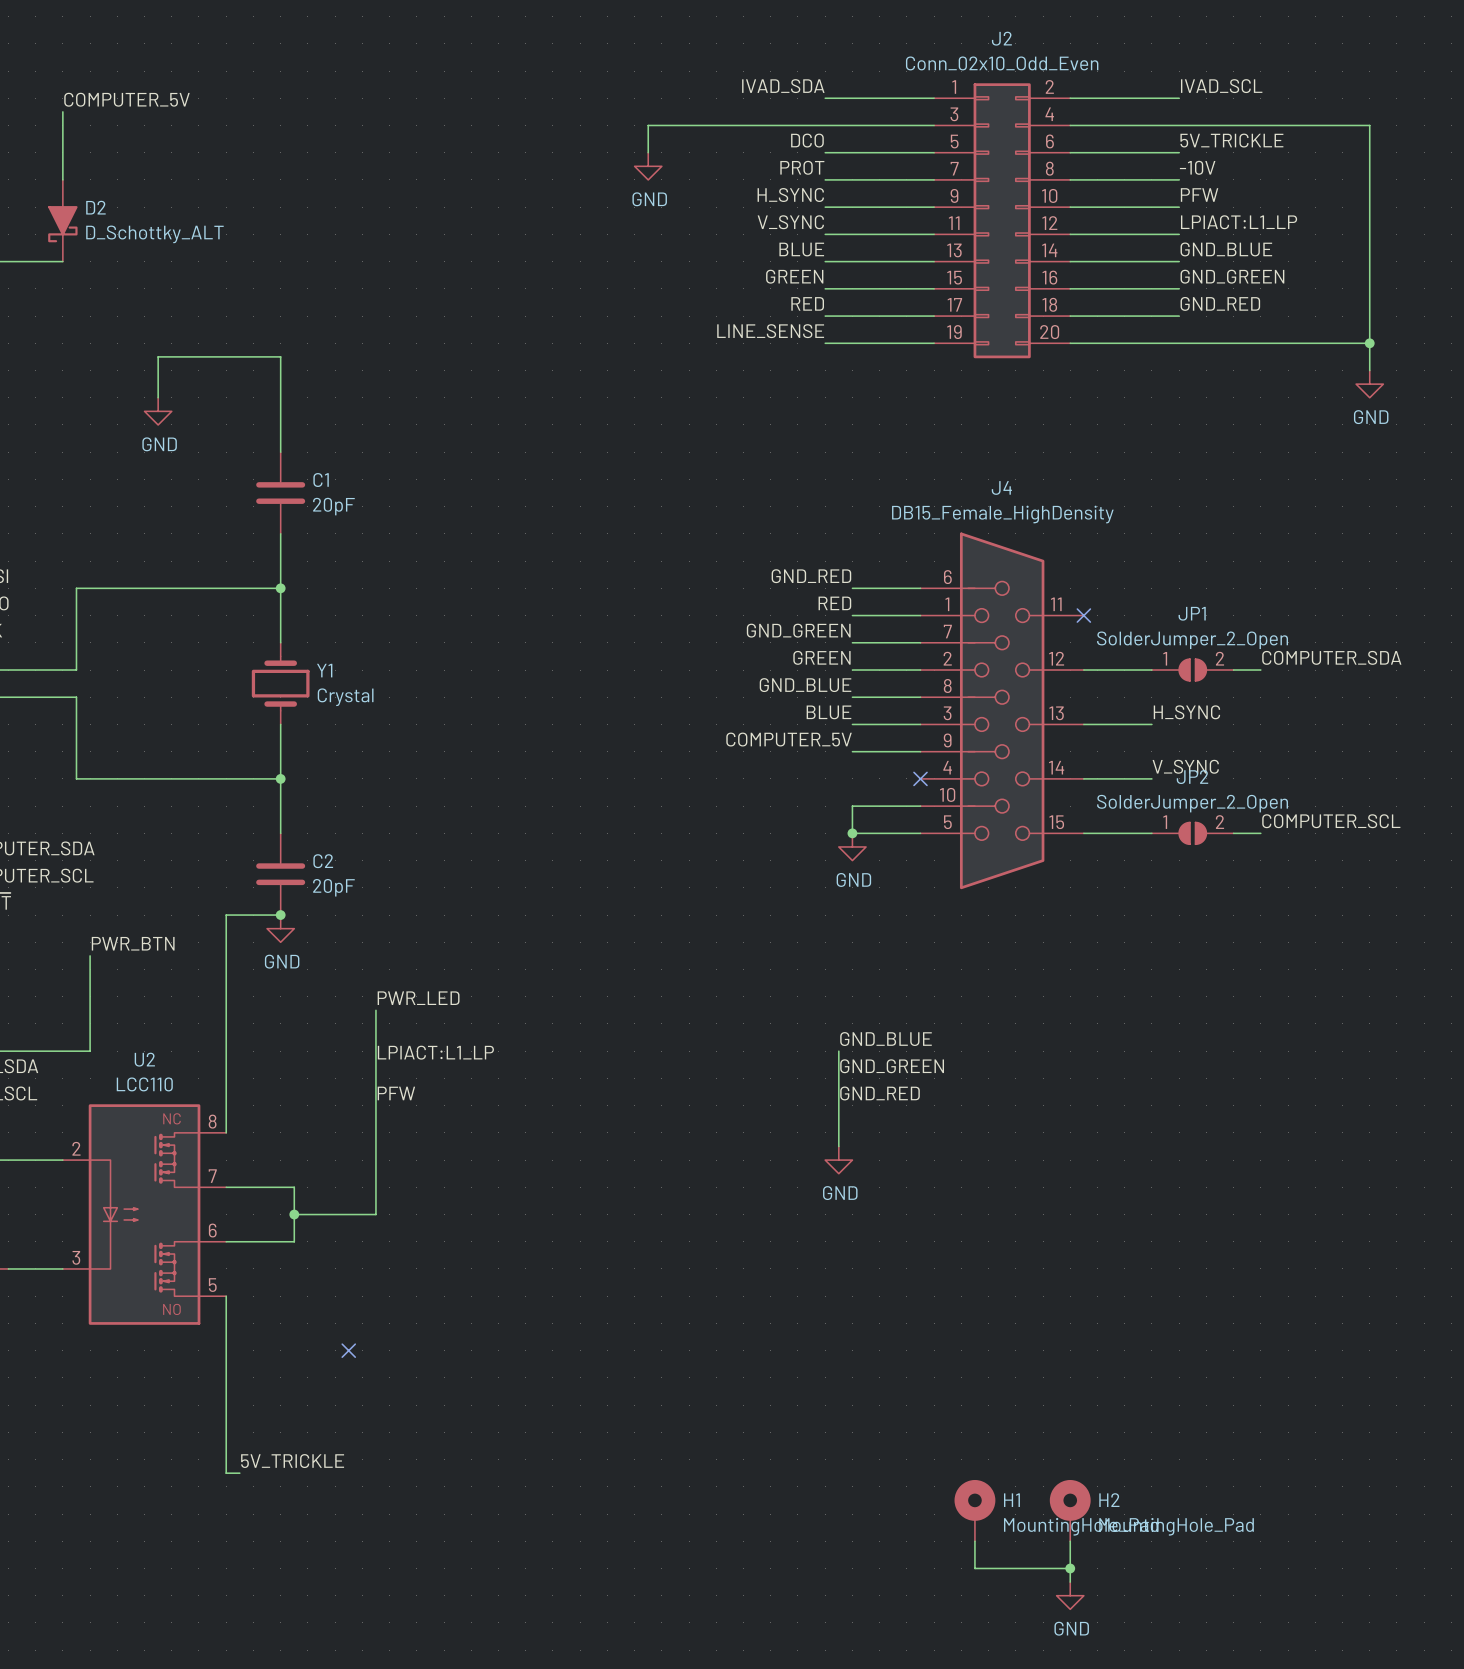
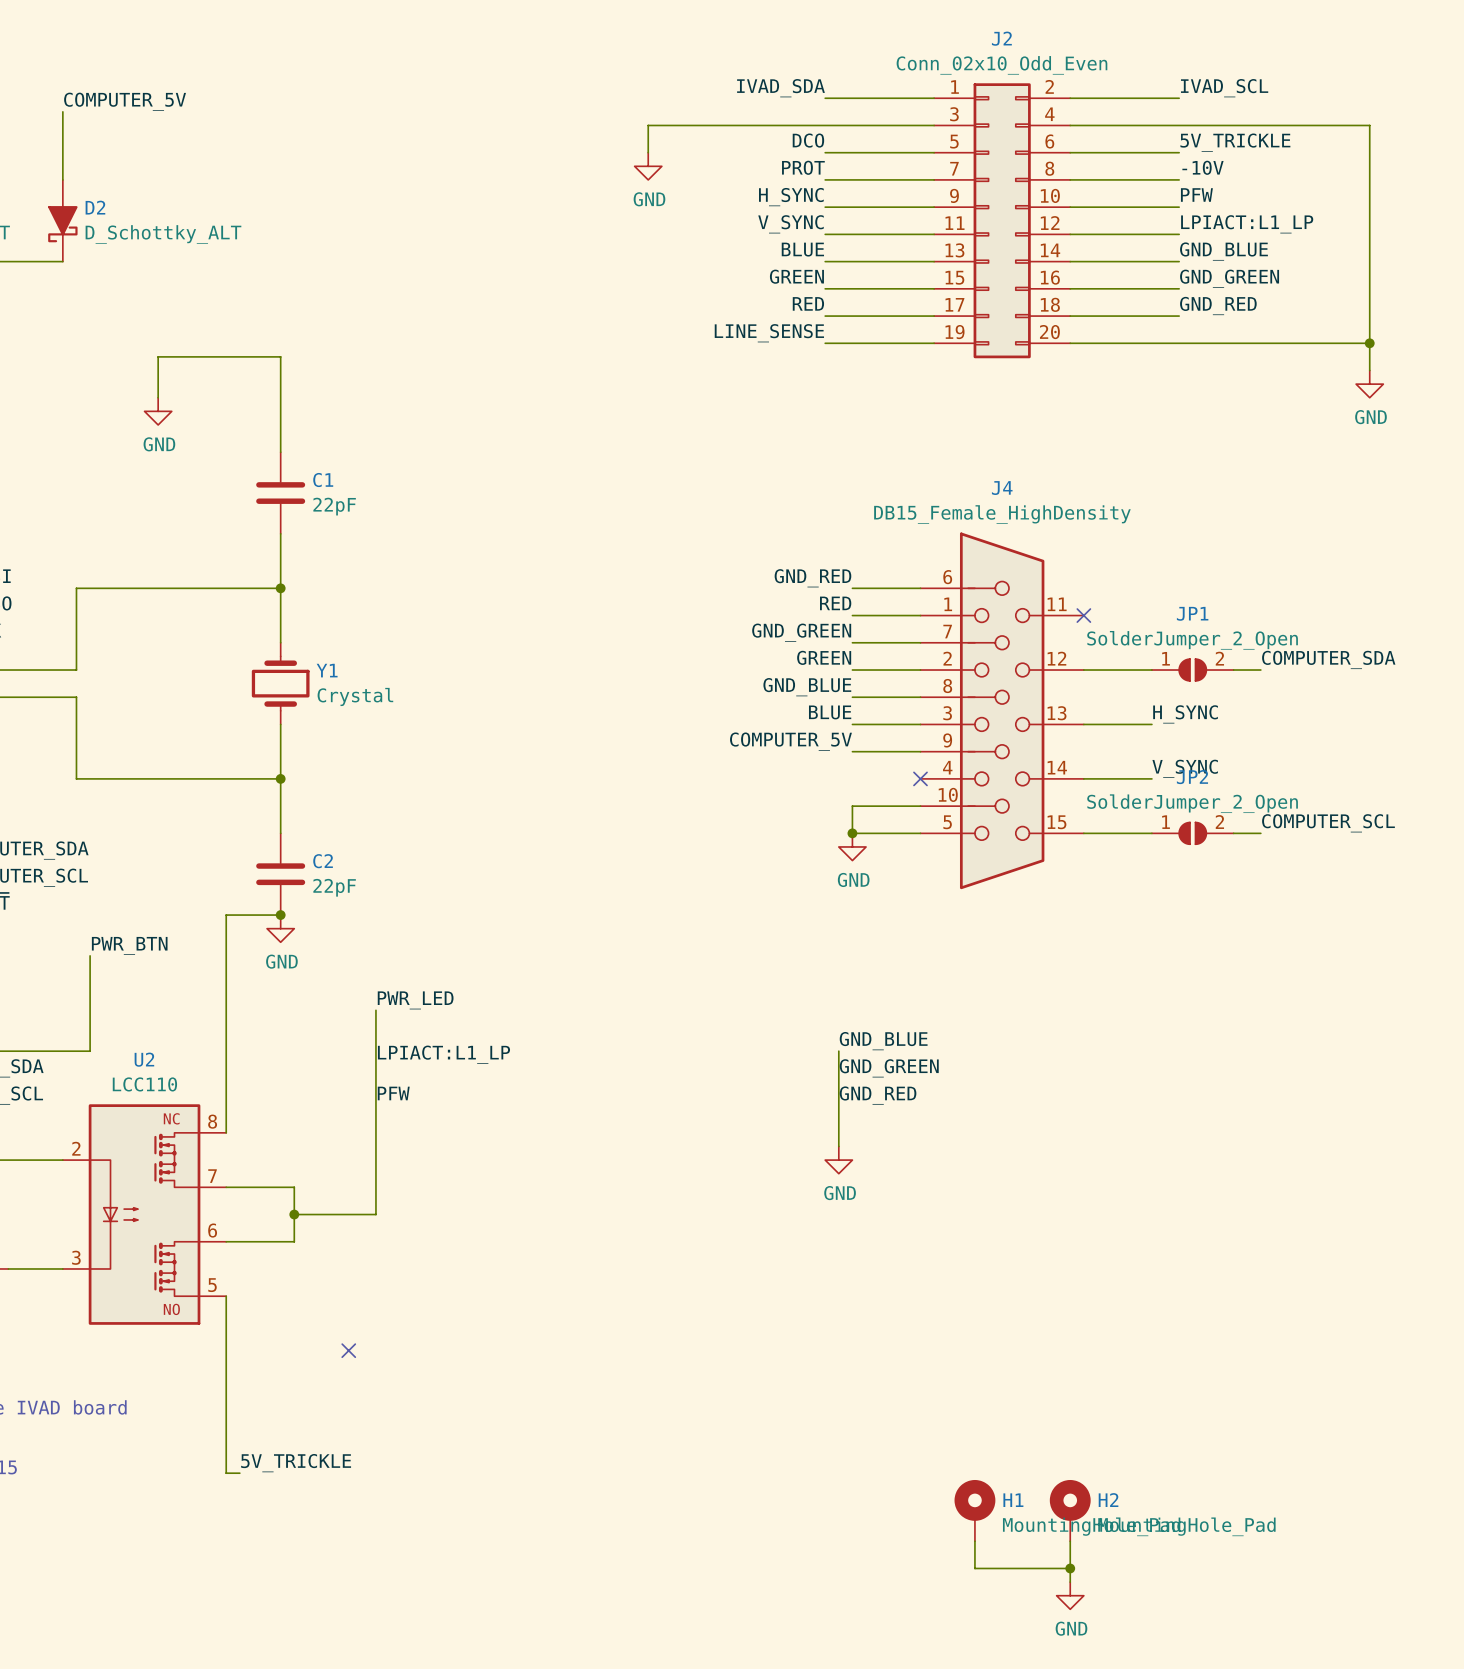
C1 value: 20pF (333, 506) -> 22pF (334, 506)
C2 value: 20pF (333, 887) -> 22pF (334, 887)

